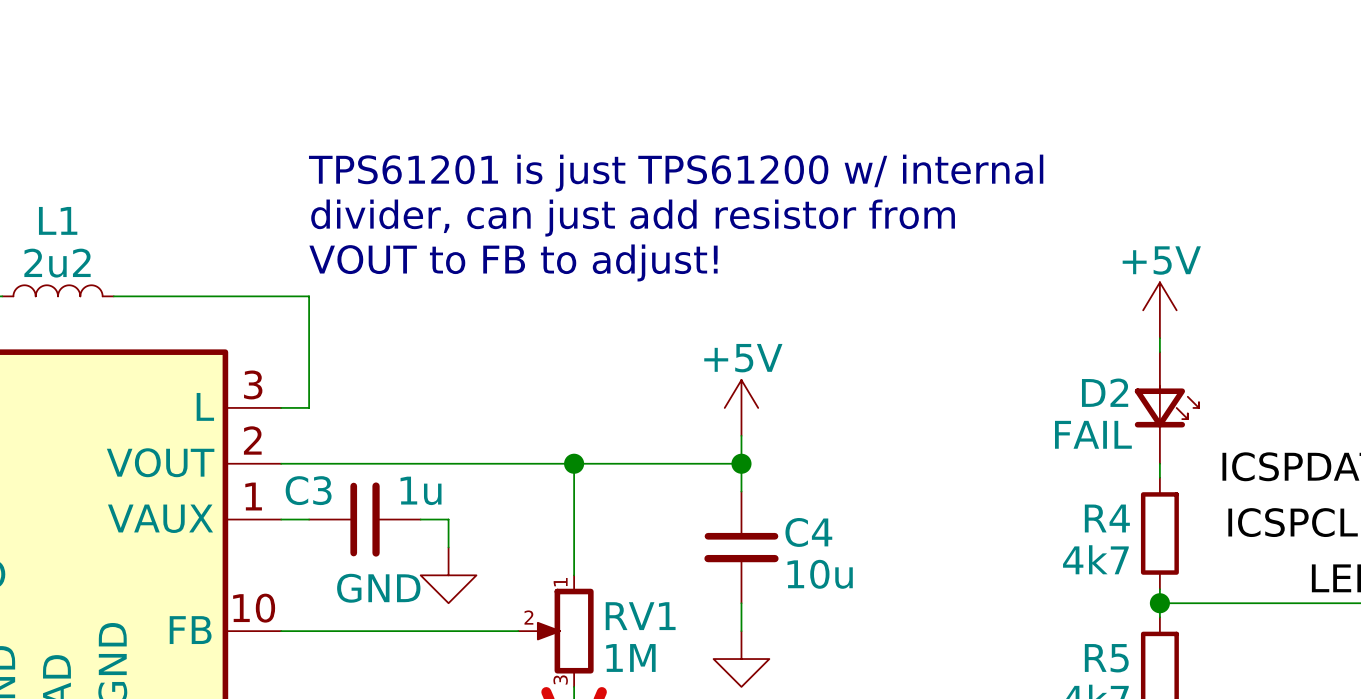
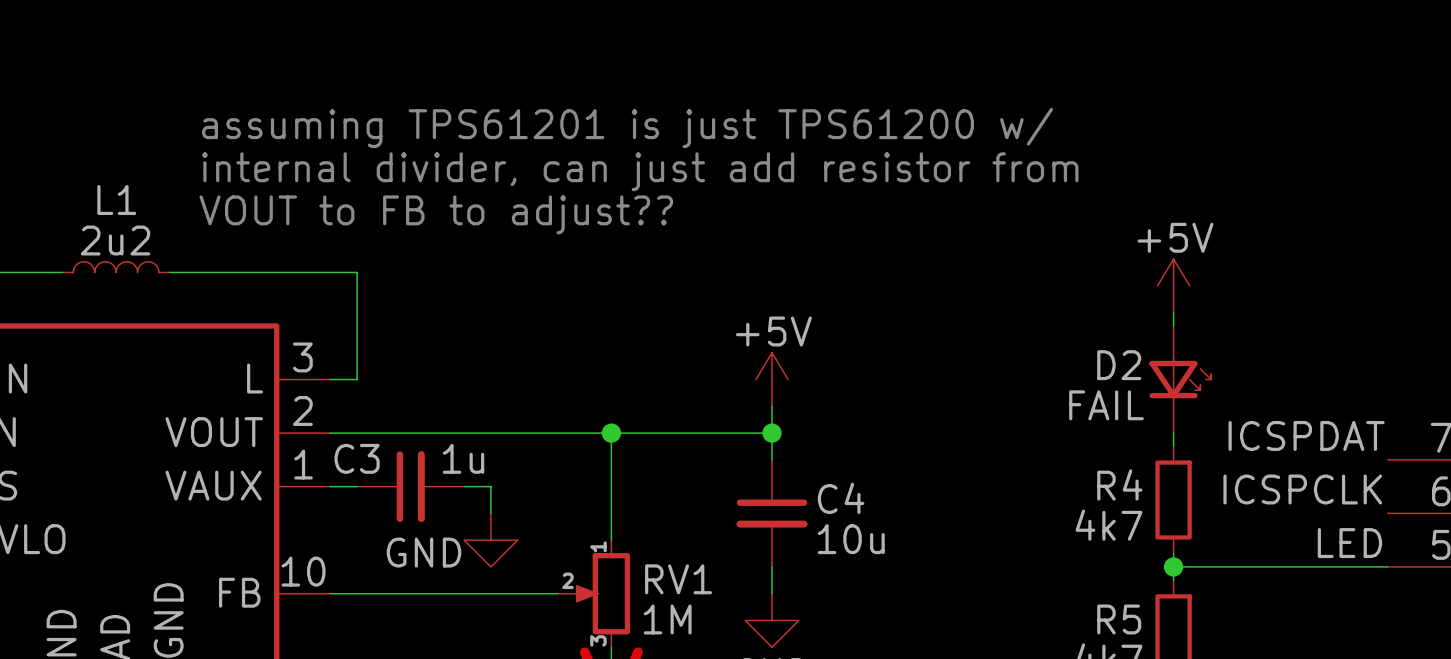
text: TPS61201 is just TPS61200 w/ internal (676, 173) -> assuming TPS61201 is just TPS61200 w/ (627, 127)
text: divider, can just add resistor from (633, 218) -> internal divider, can just add resistor from (640, 171)
text: VOUT to FB to adjust! (513, 262) -> VOUT to FB to adjust?? (436, 214)

